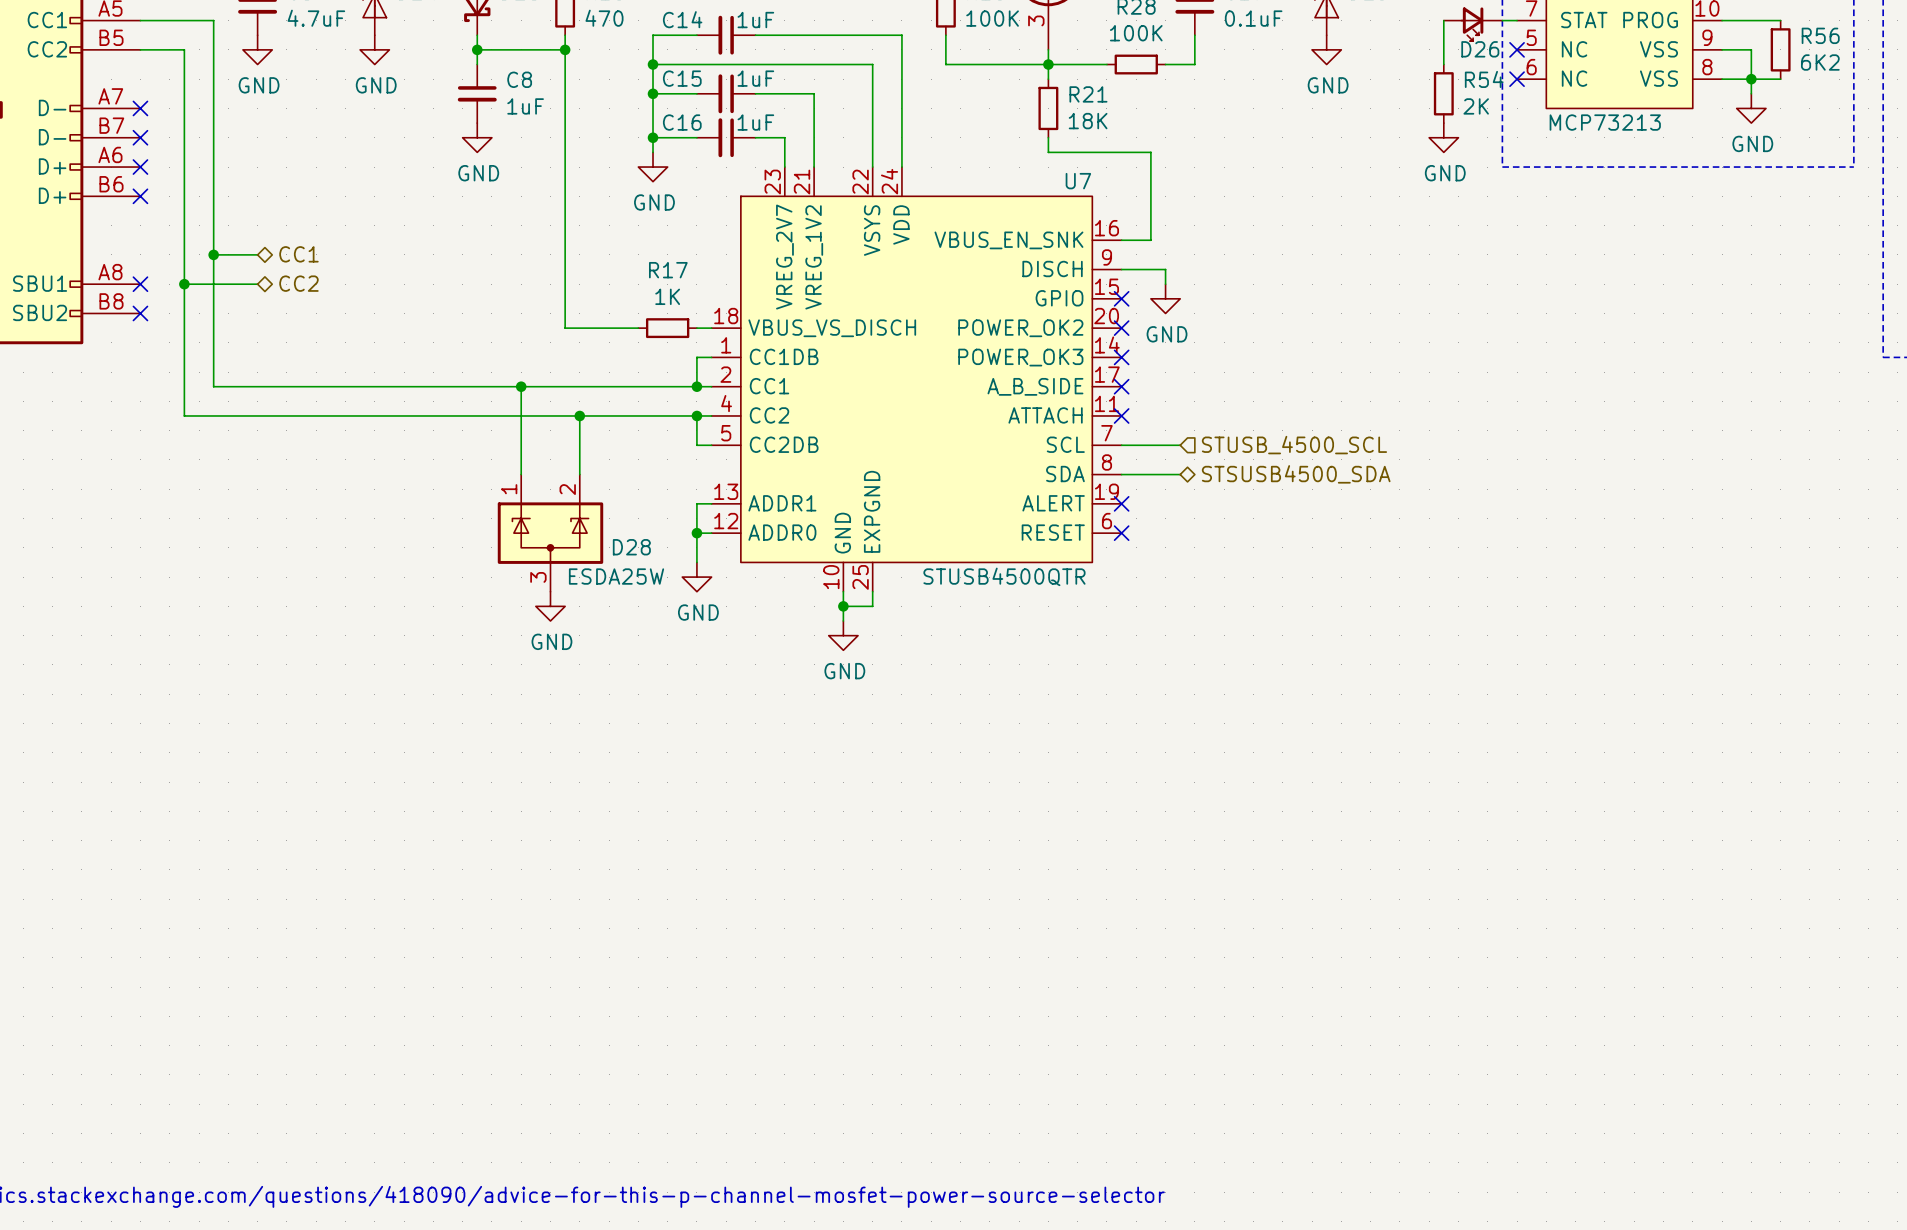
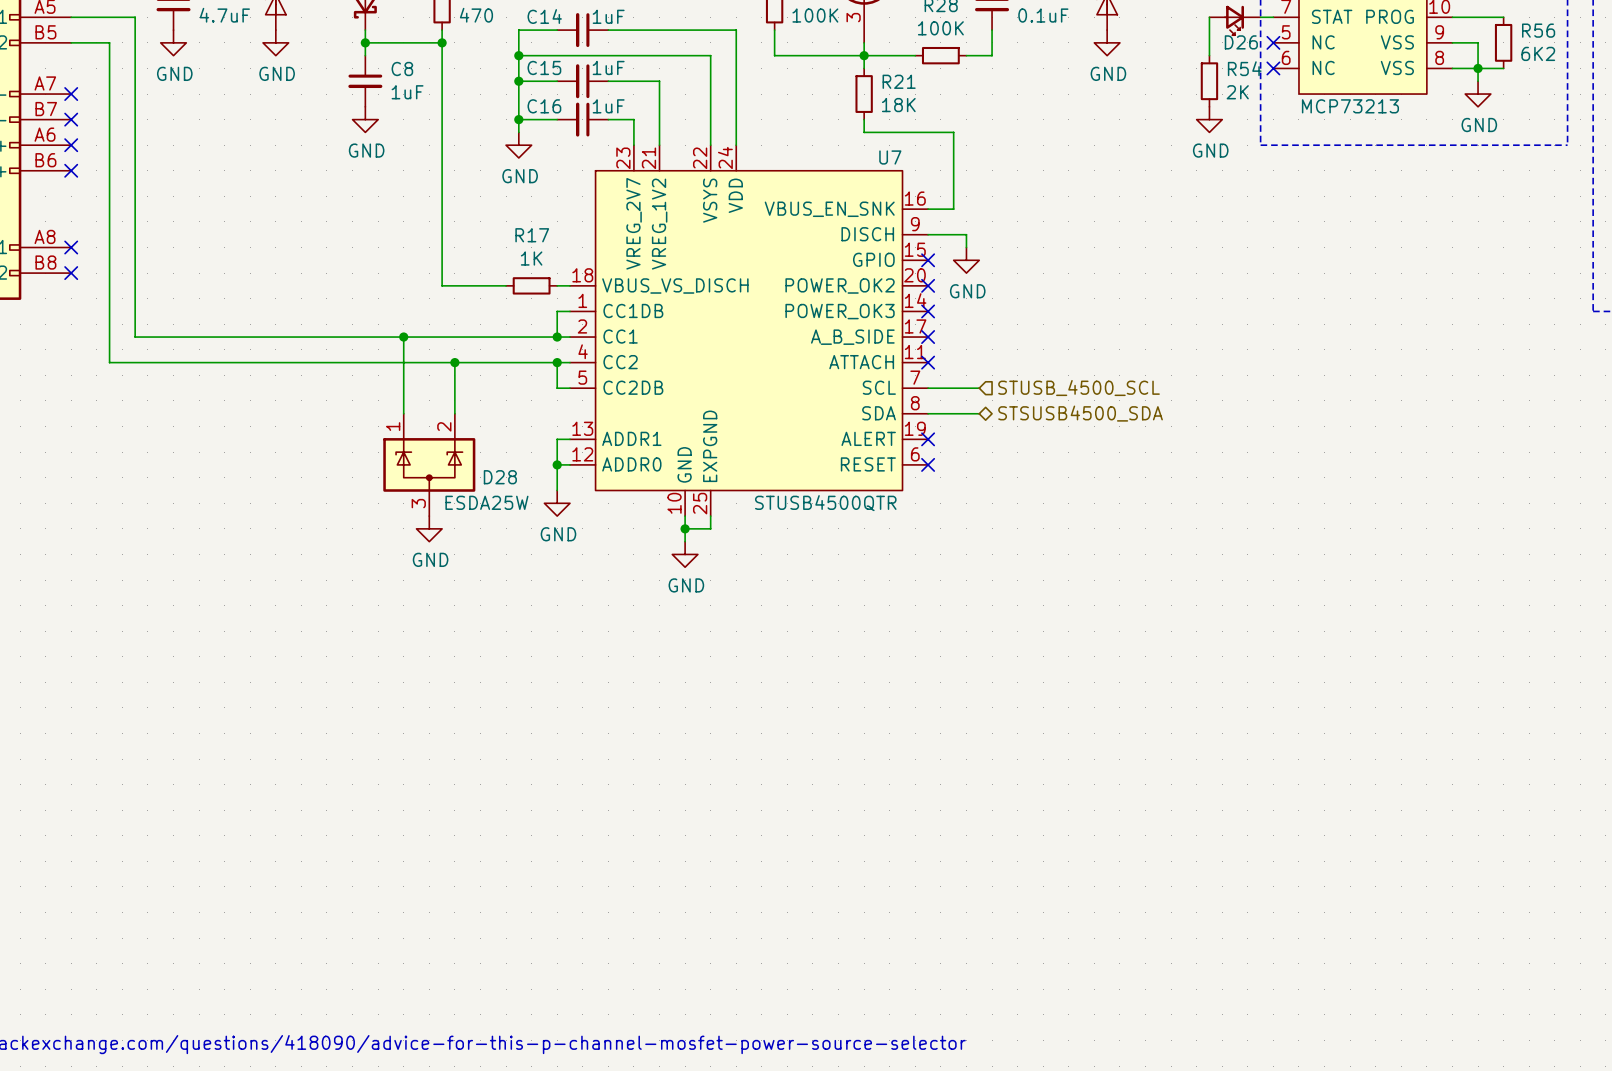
wire: (213, 254) (257, 254) -> none
junction: (213, 254) -> none
hierarchical label: CC1 (298, 254) -> none
hierarchical label: CC2 (298, 283) -> none
wire: (184, 284) (257, 284) -> none
junction: (184, 284) -> none

